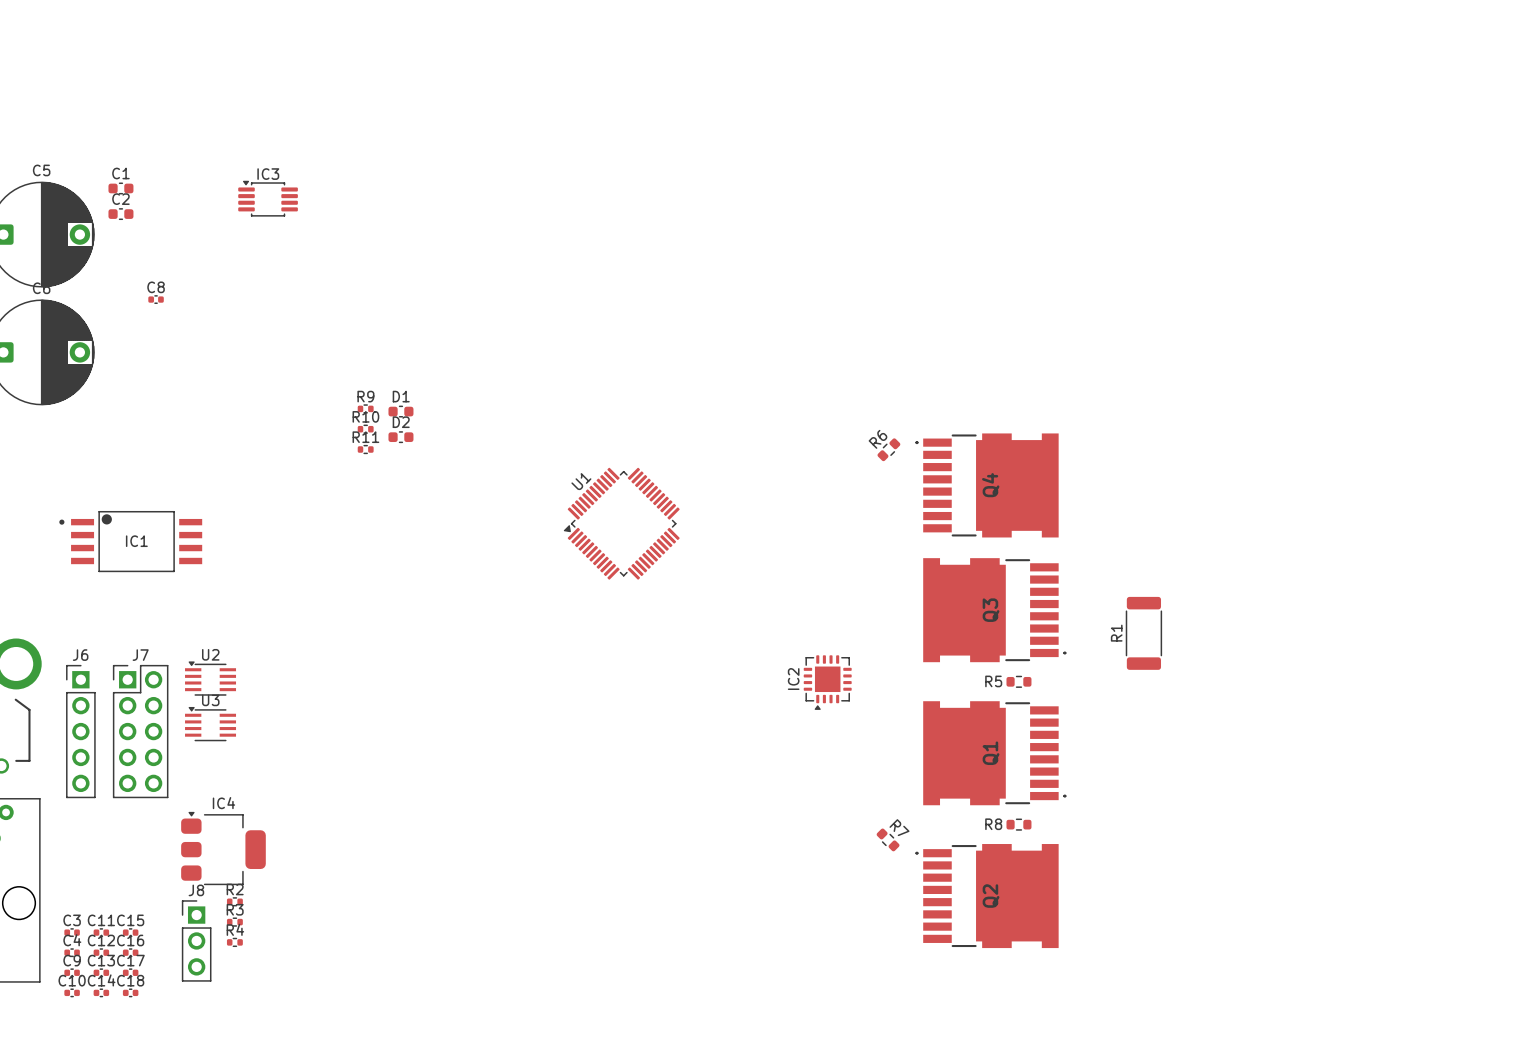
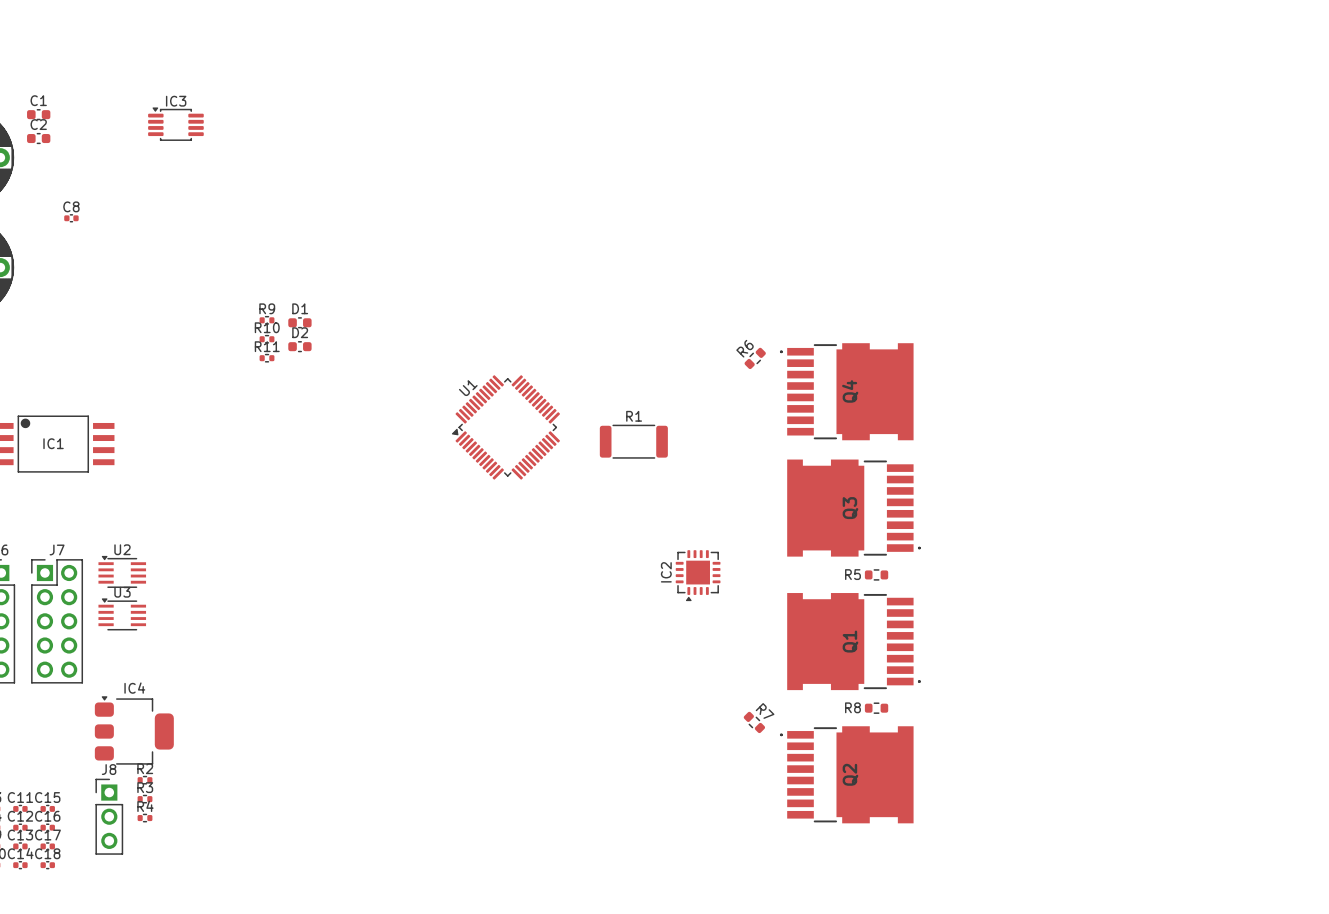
R1 rotation: 0° (1143, 633) -> 90° clockwise (633, 441)
R1 position: (1143, 633) -> (633, 441)

